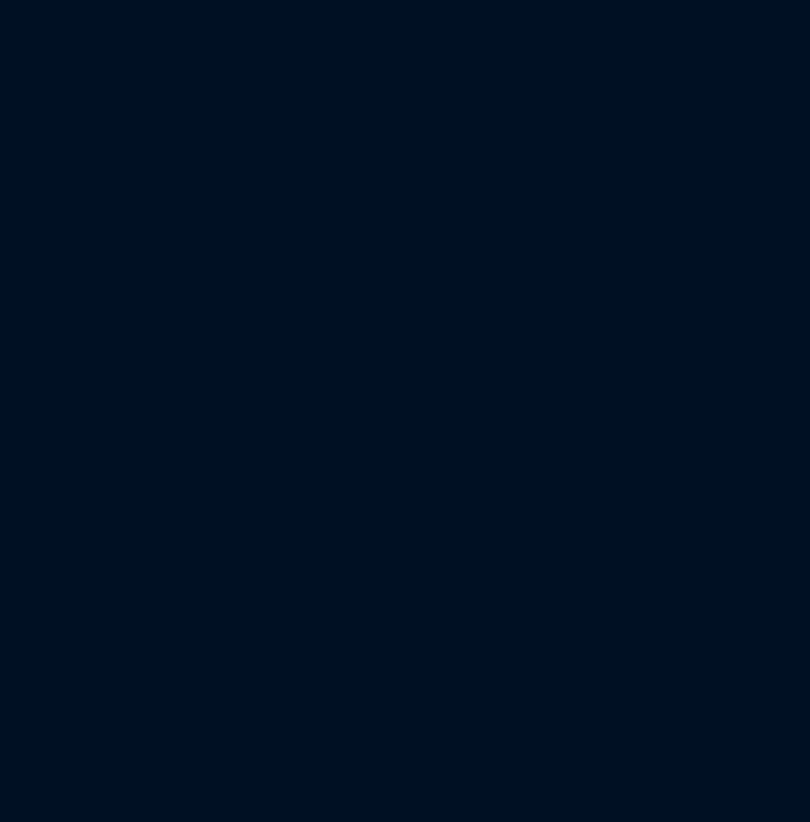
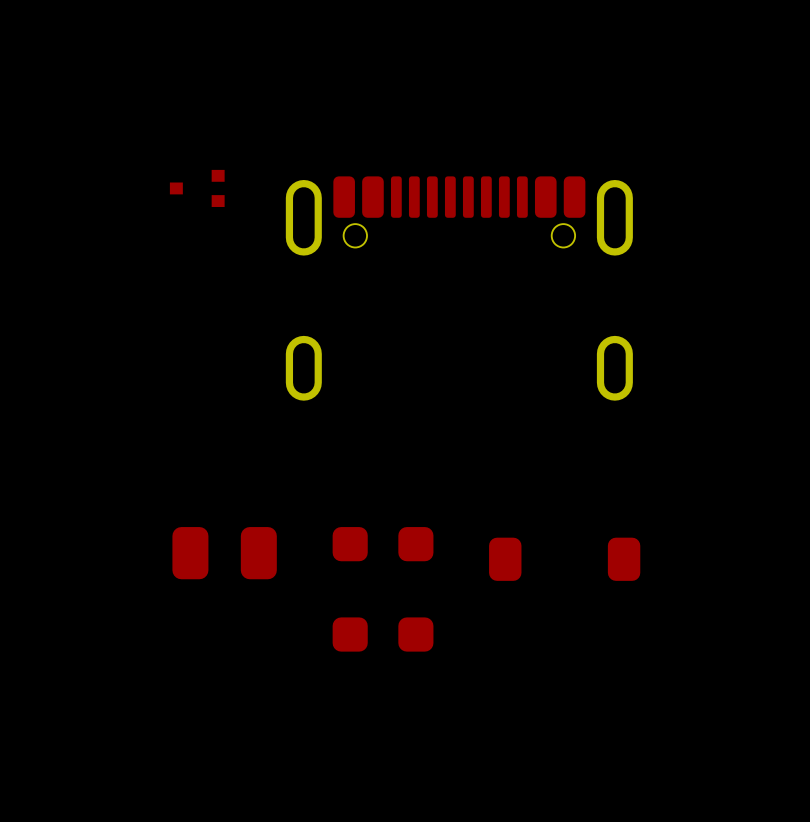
part: none -> (197, 188)
part: none -> (459, 288)
part: none -> (383, 544)
part: none -> (224, 553)
part: none -> (564, 559)
part: none -> (383, 634)

